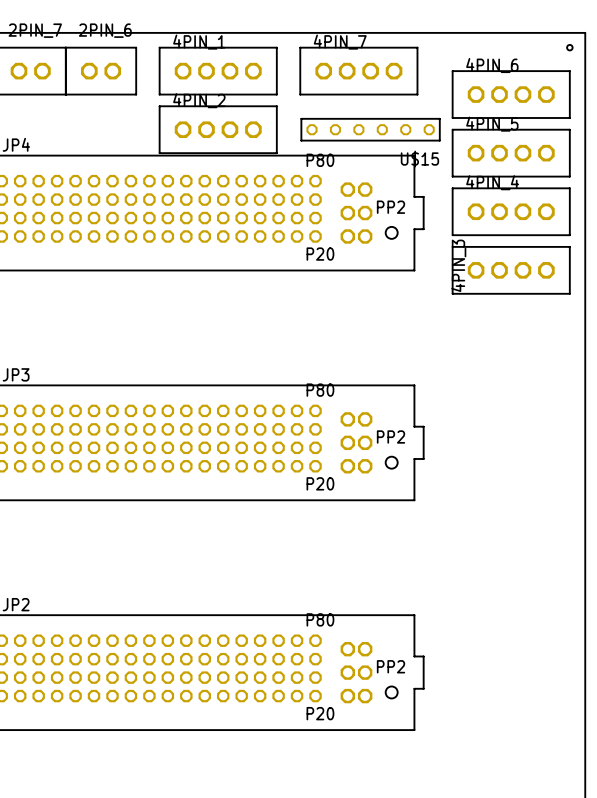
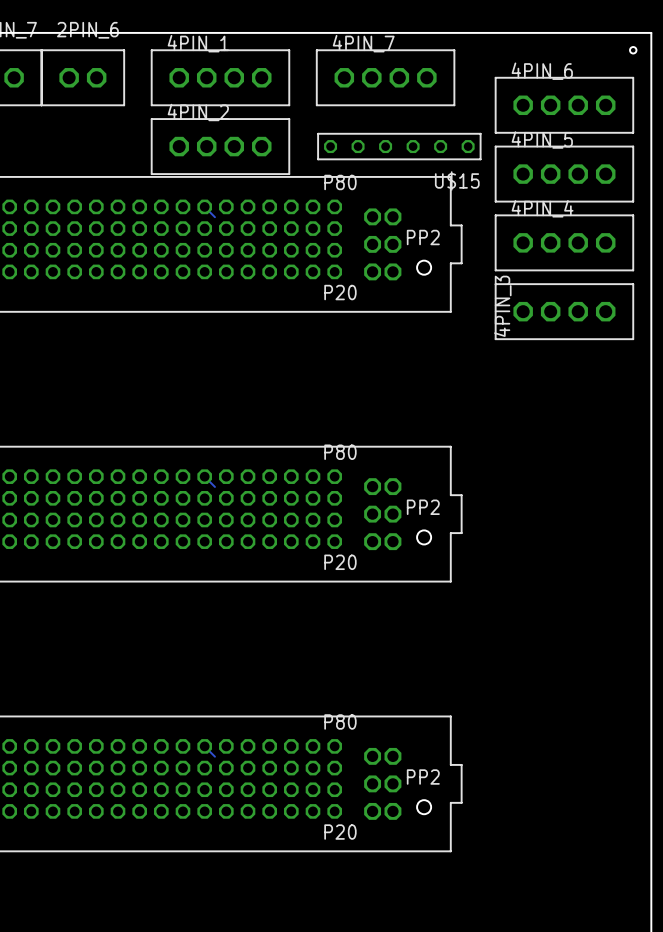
bottom track: none -> (204, 206) (214, 217)
bottom track: none -> (204, 476) (214, 486)
bottom track: none -> (204, 746) (214, 756)

